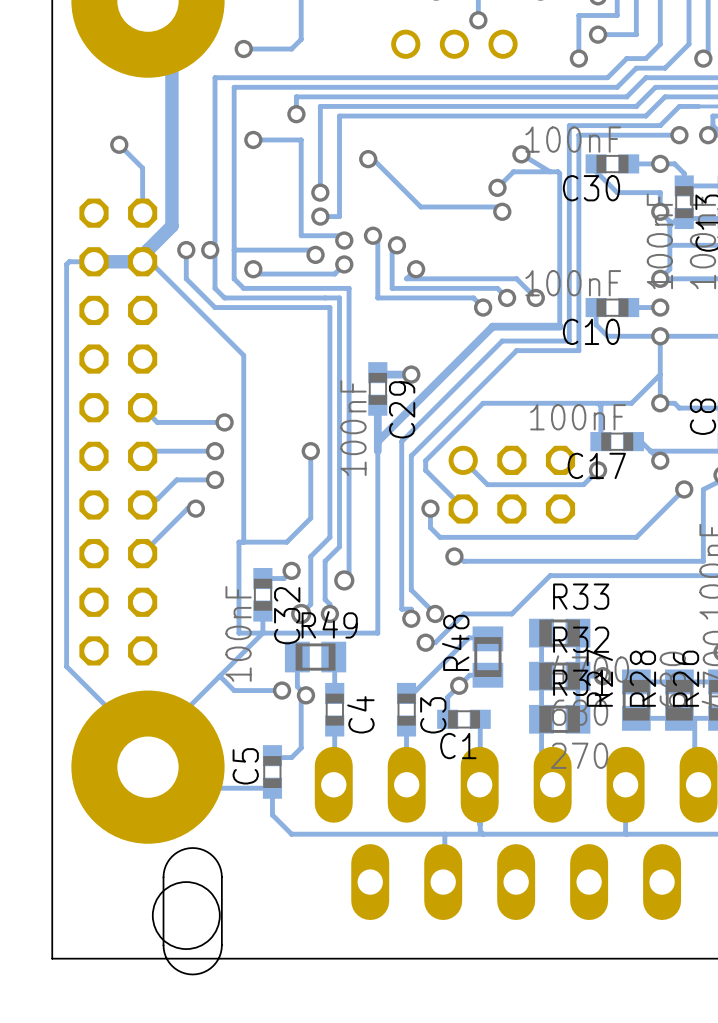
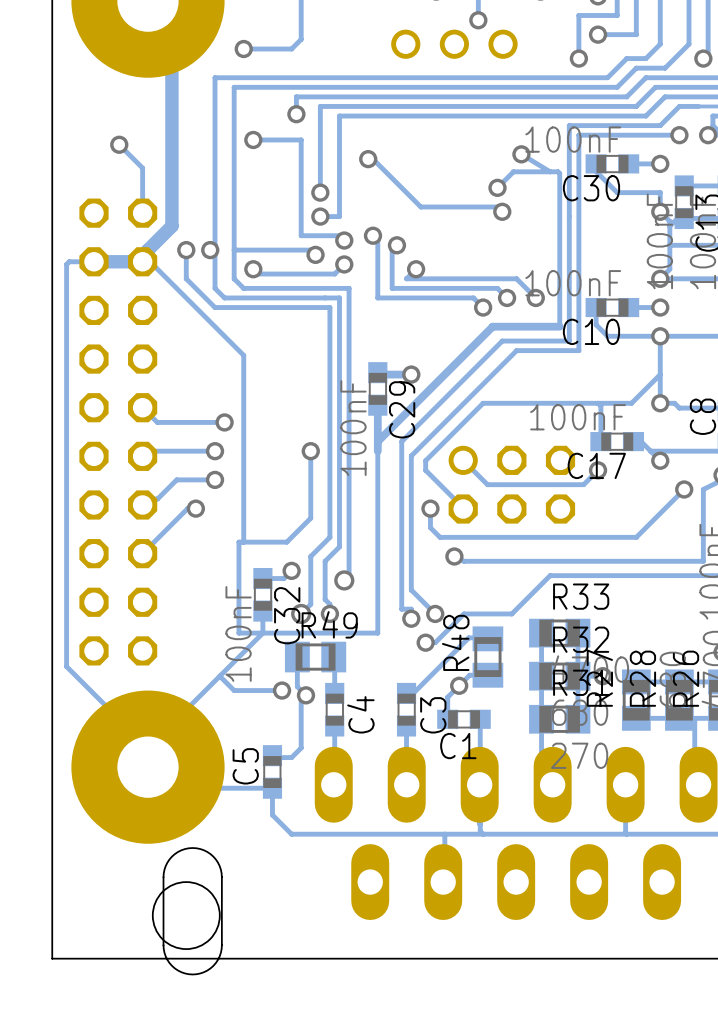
track: (660, 163) (674, 163) (684, 173) (684, 185) -> none

